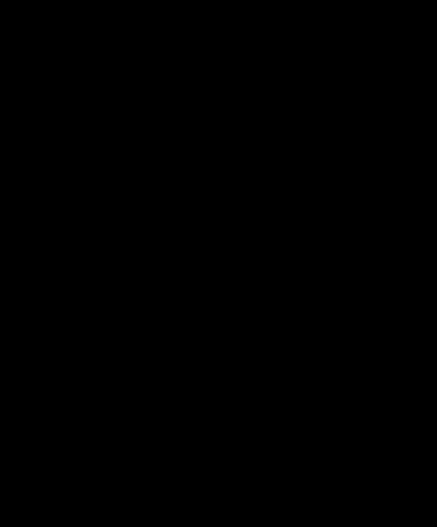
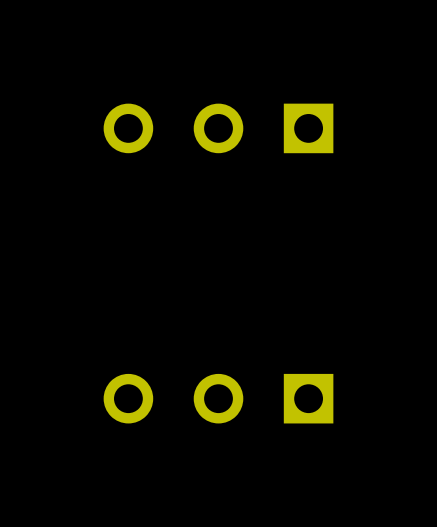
part: none -> (218, 128)
part: none -> (218, 398)

